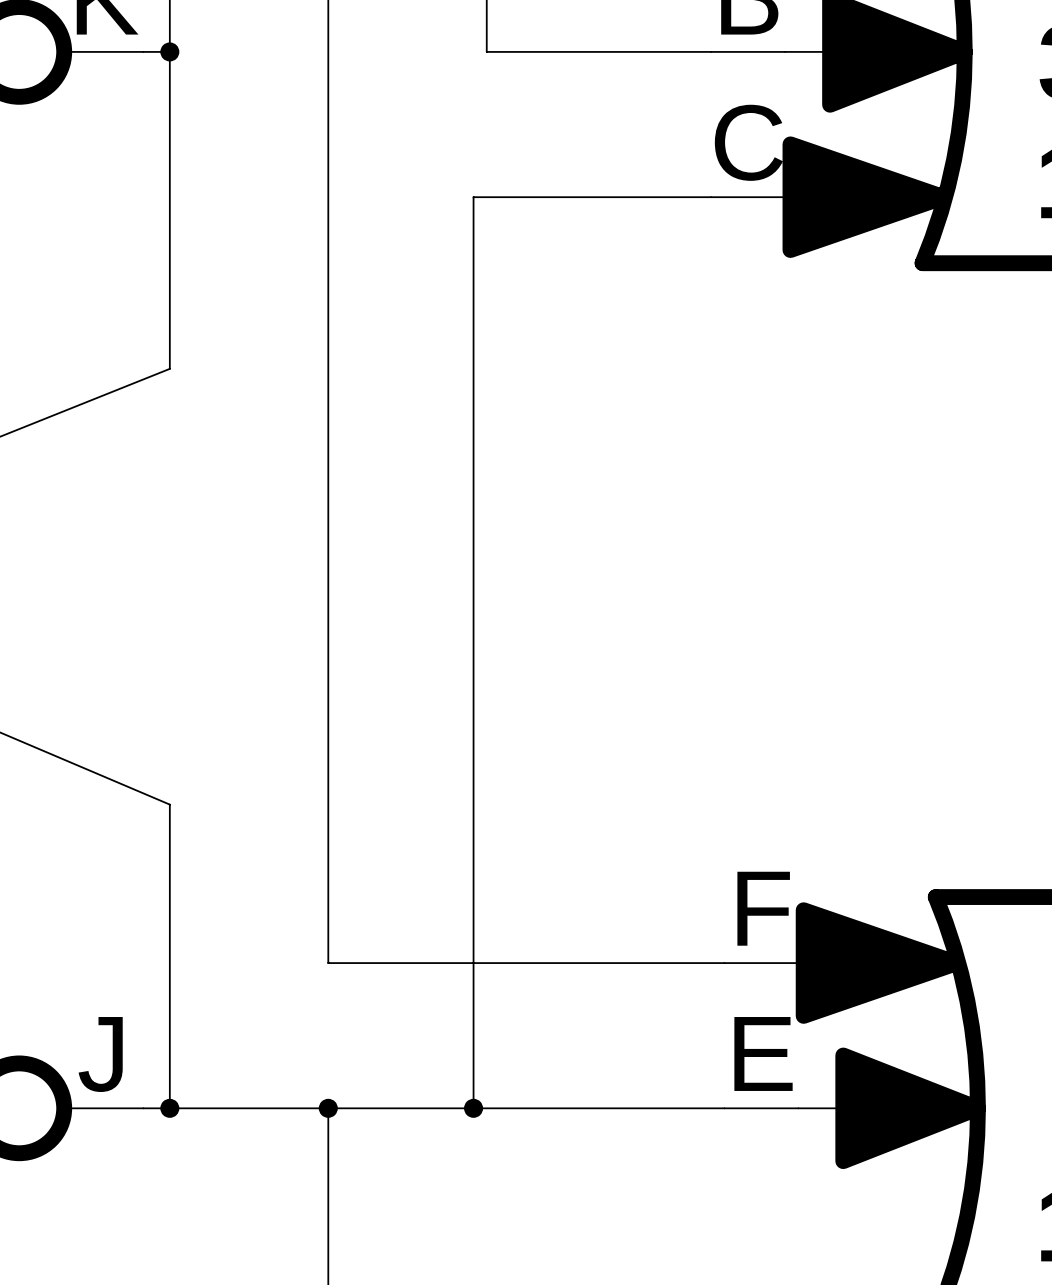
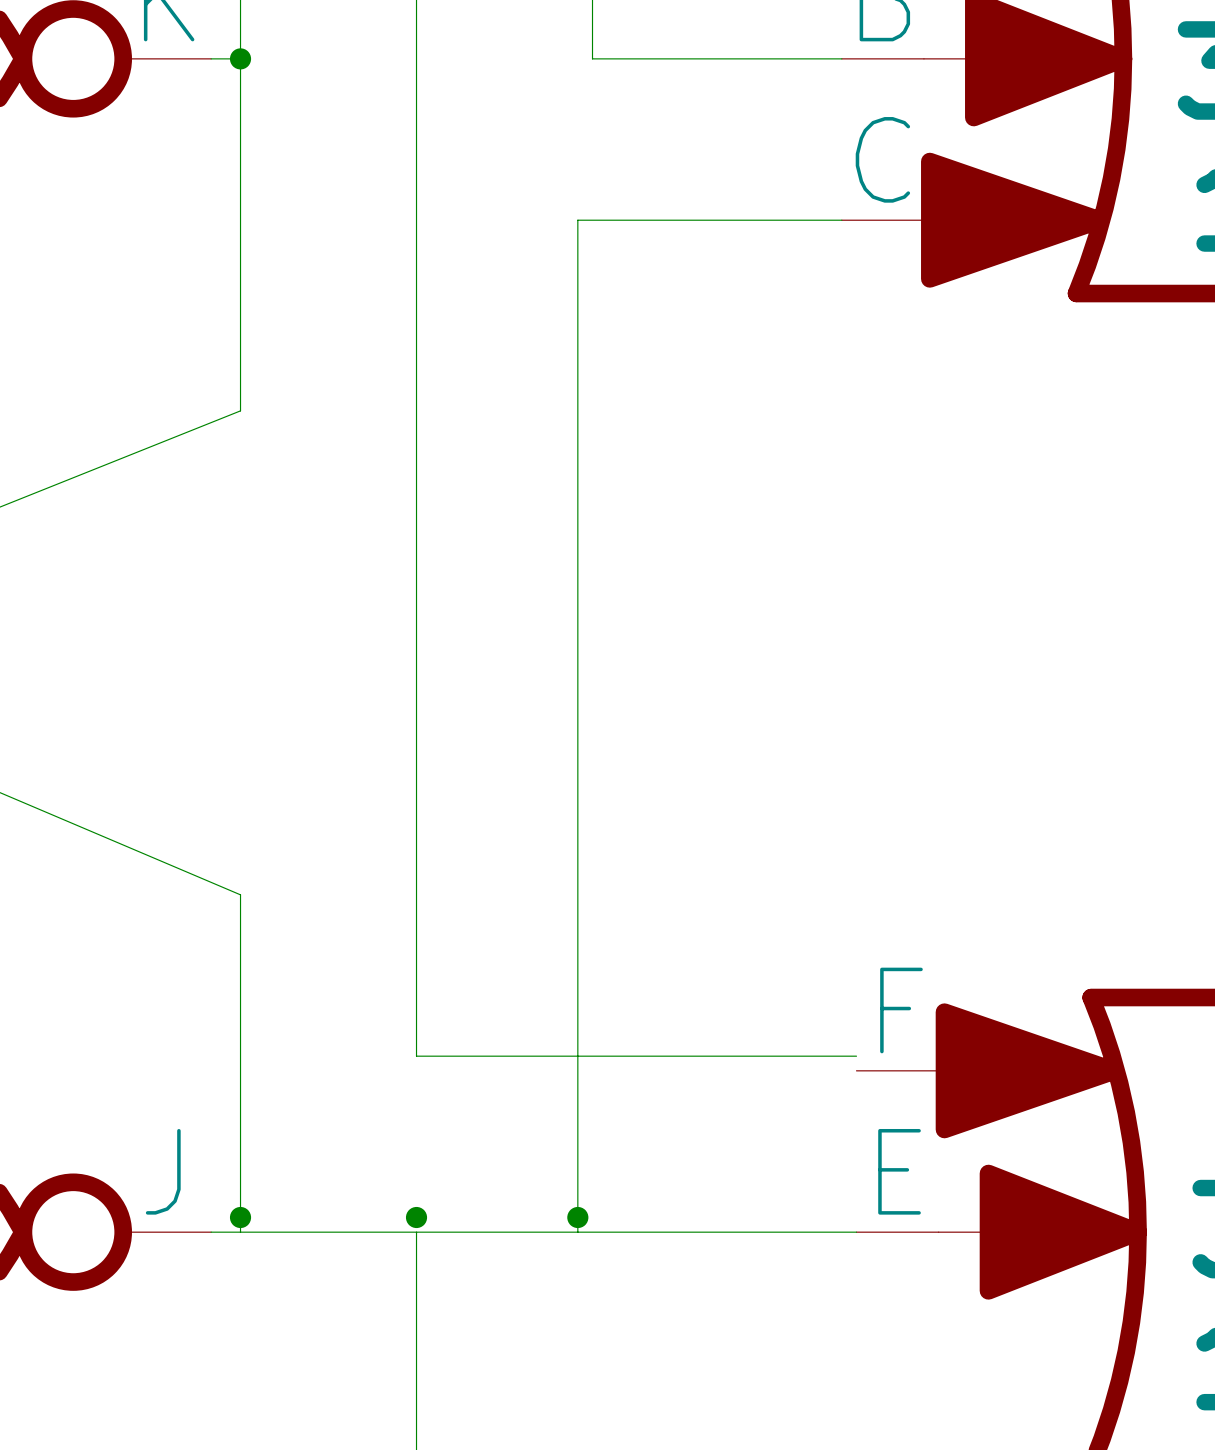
wire: (328, 949) (328, 963) (724, 963) -> (416, 1056) (856, 1056)
junction position: (169, 1108) -> (240, 1217)
junction position: (328, 1108) -> (416, 1217)
junction position: (473, 1108) -> (577, 1217)

